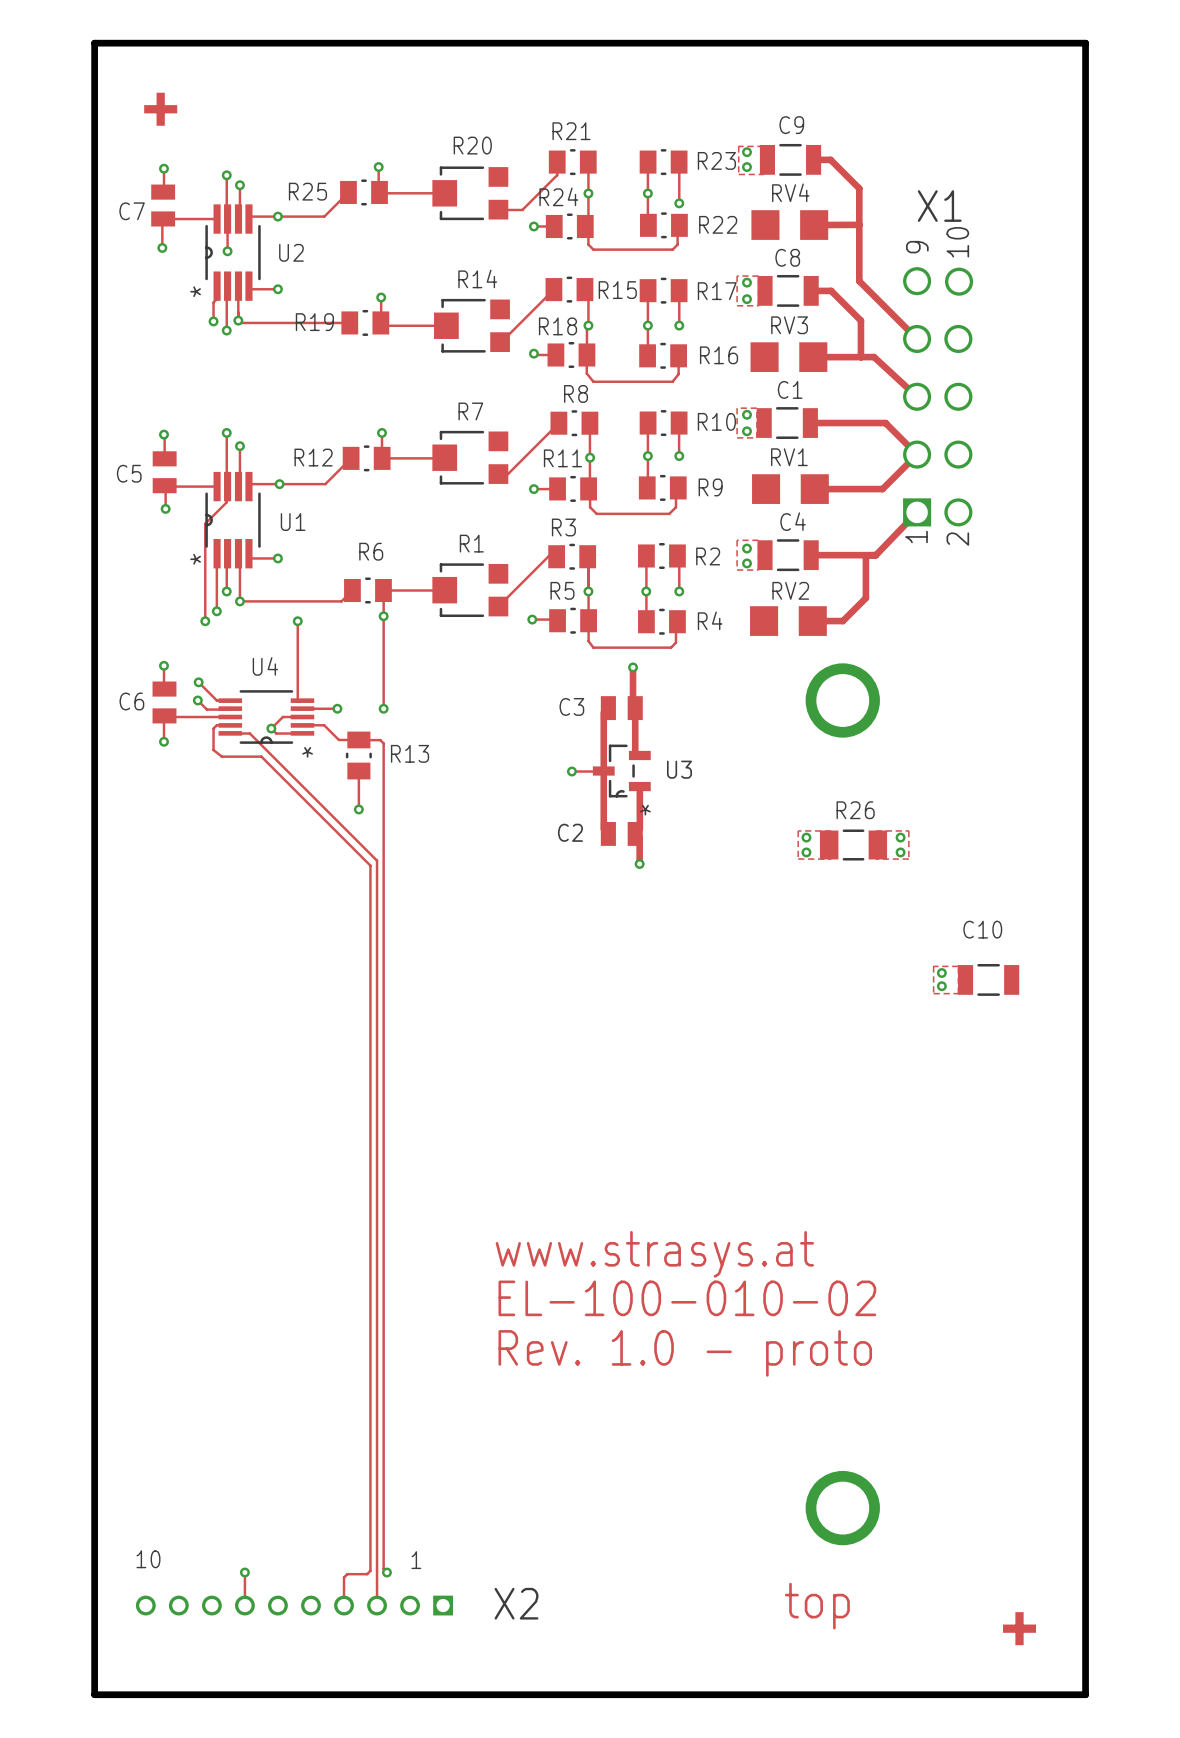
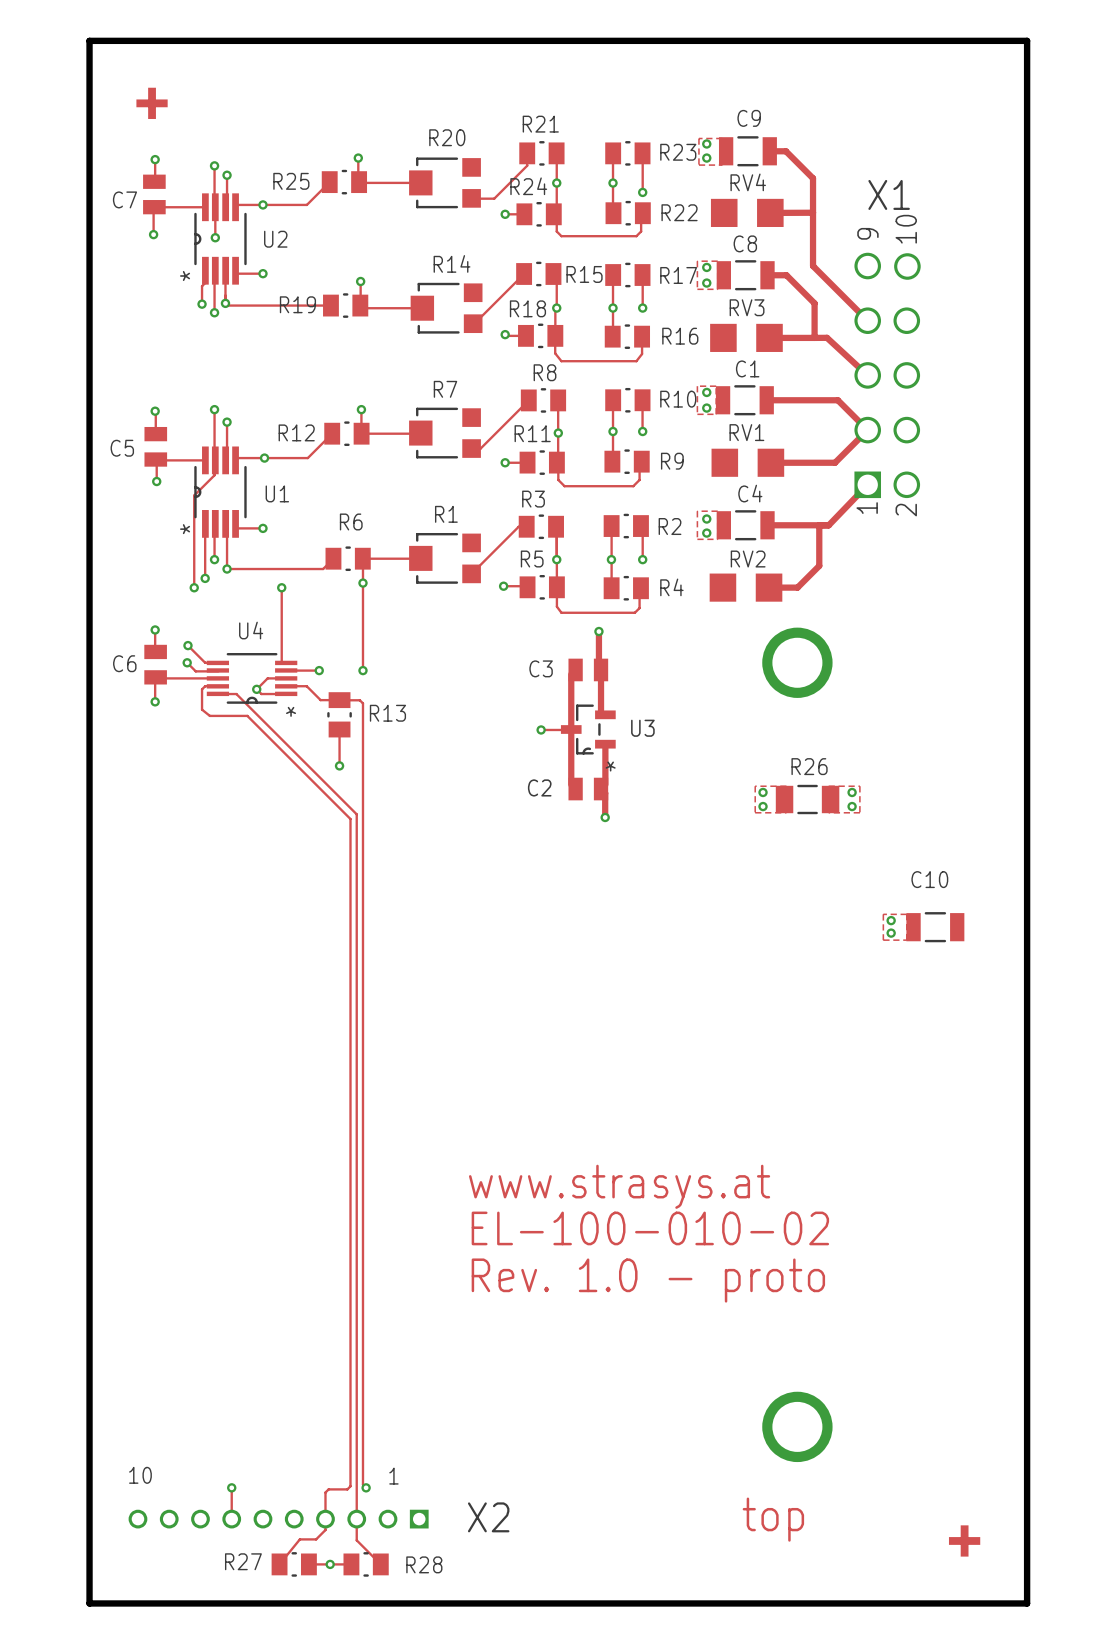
track: none -> (325, 1519) (325, 1530) (316, 1539) (299, 1539) (279, 1564)
track: none -> (356, 1519) (356, 1540) (380, 1564)
track: none -> (352, 1562) (351, 1564) (308, 1564)
R27: none -> (294, 1564)
via: none -> (330, 1564)
R28: none -> (366, 1564)

